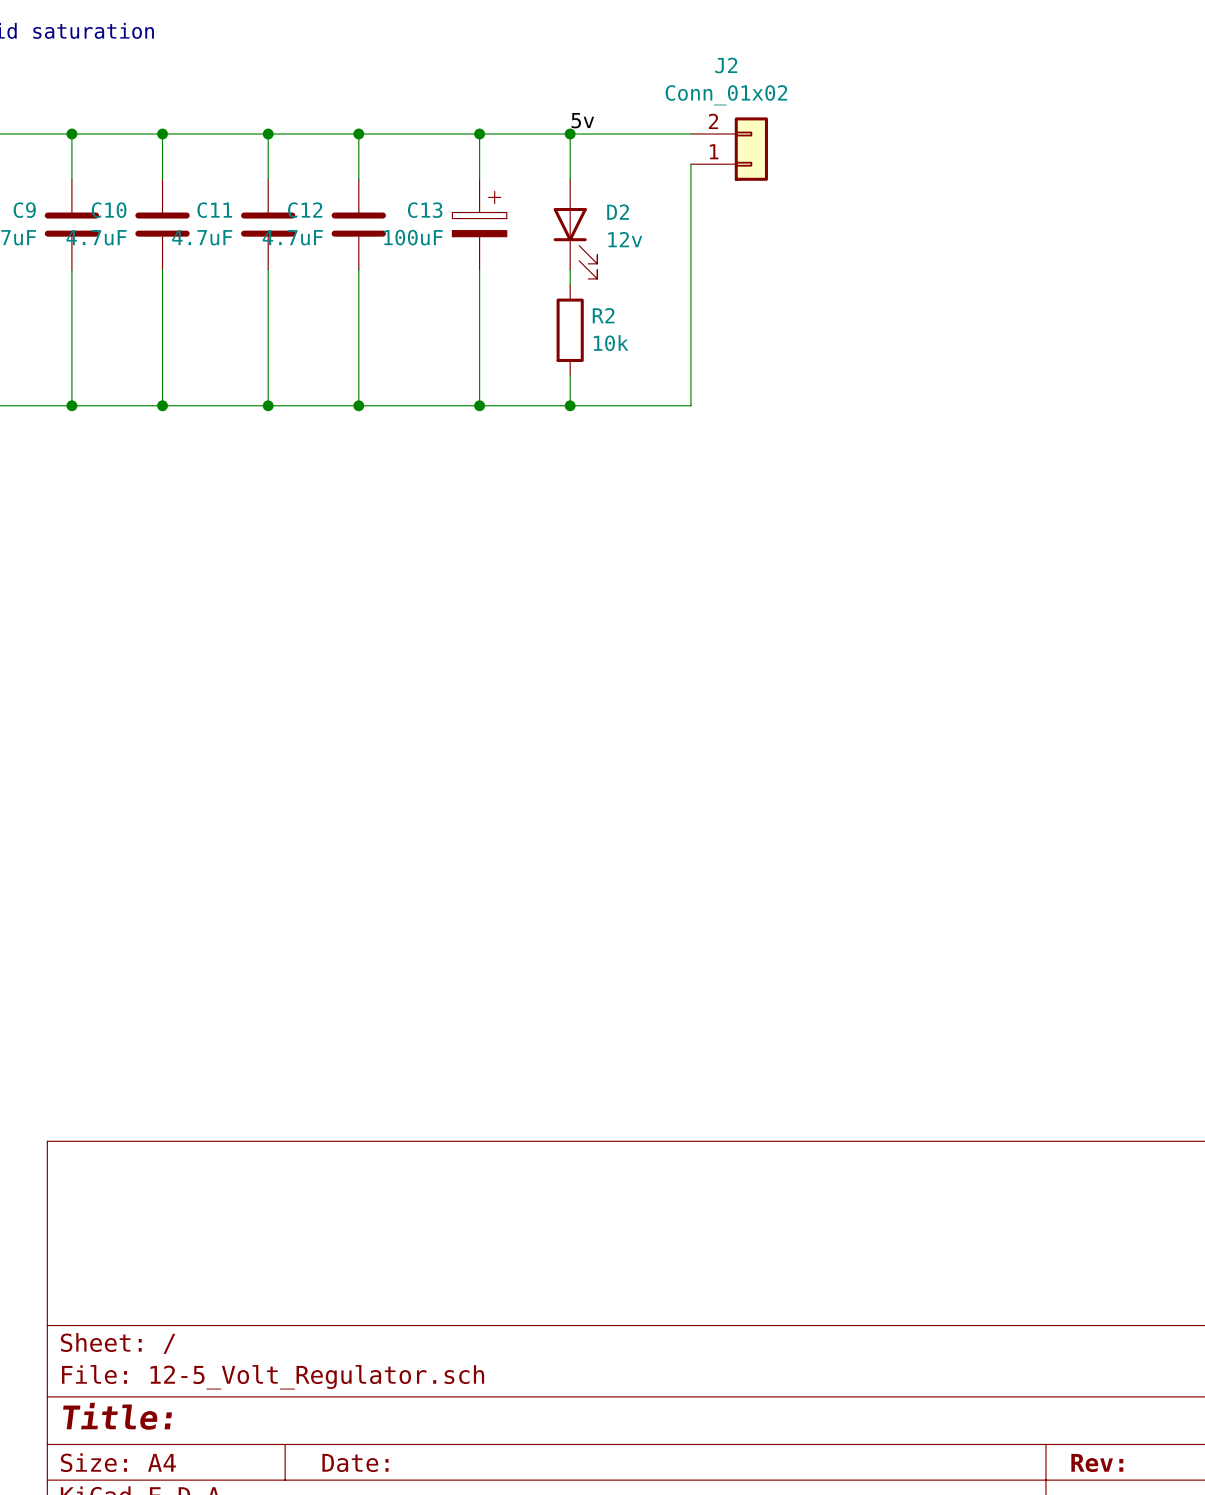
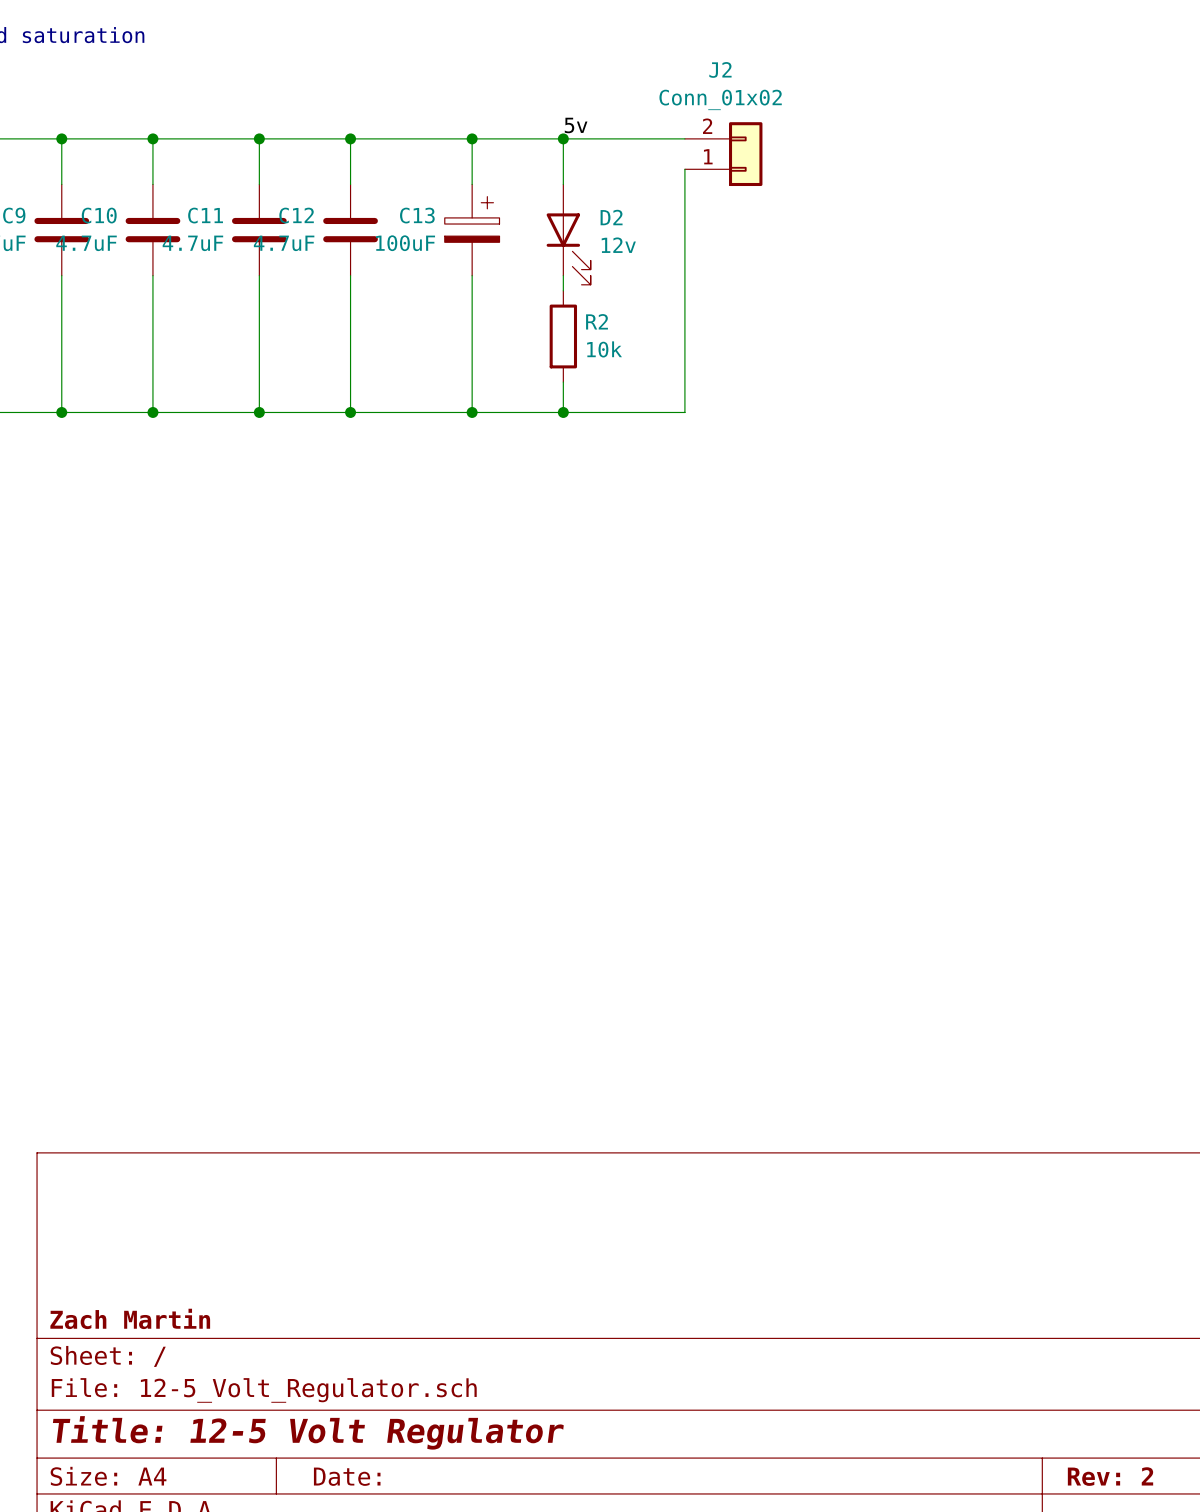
title block: none -> Zach Martin (130, 1318)
title block: Title: (117, 1416) -> Title: 12-5 Volt Regulator (308, 1432)
title block: Rev: (1097, 1462) -> Rev: 2 (1110, 1476)

